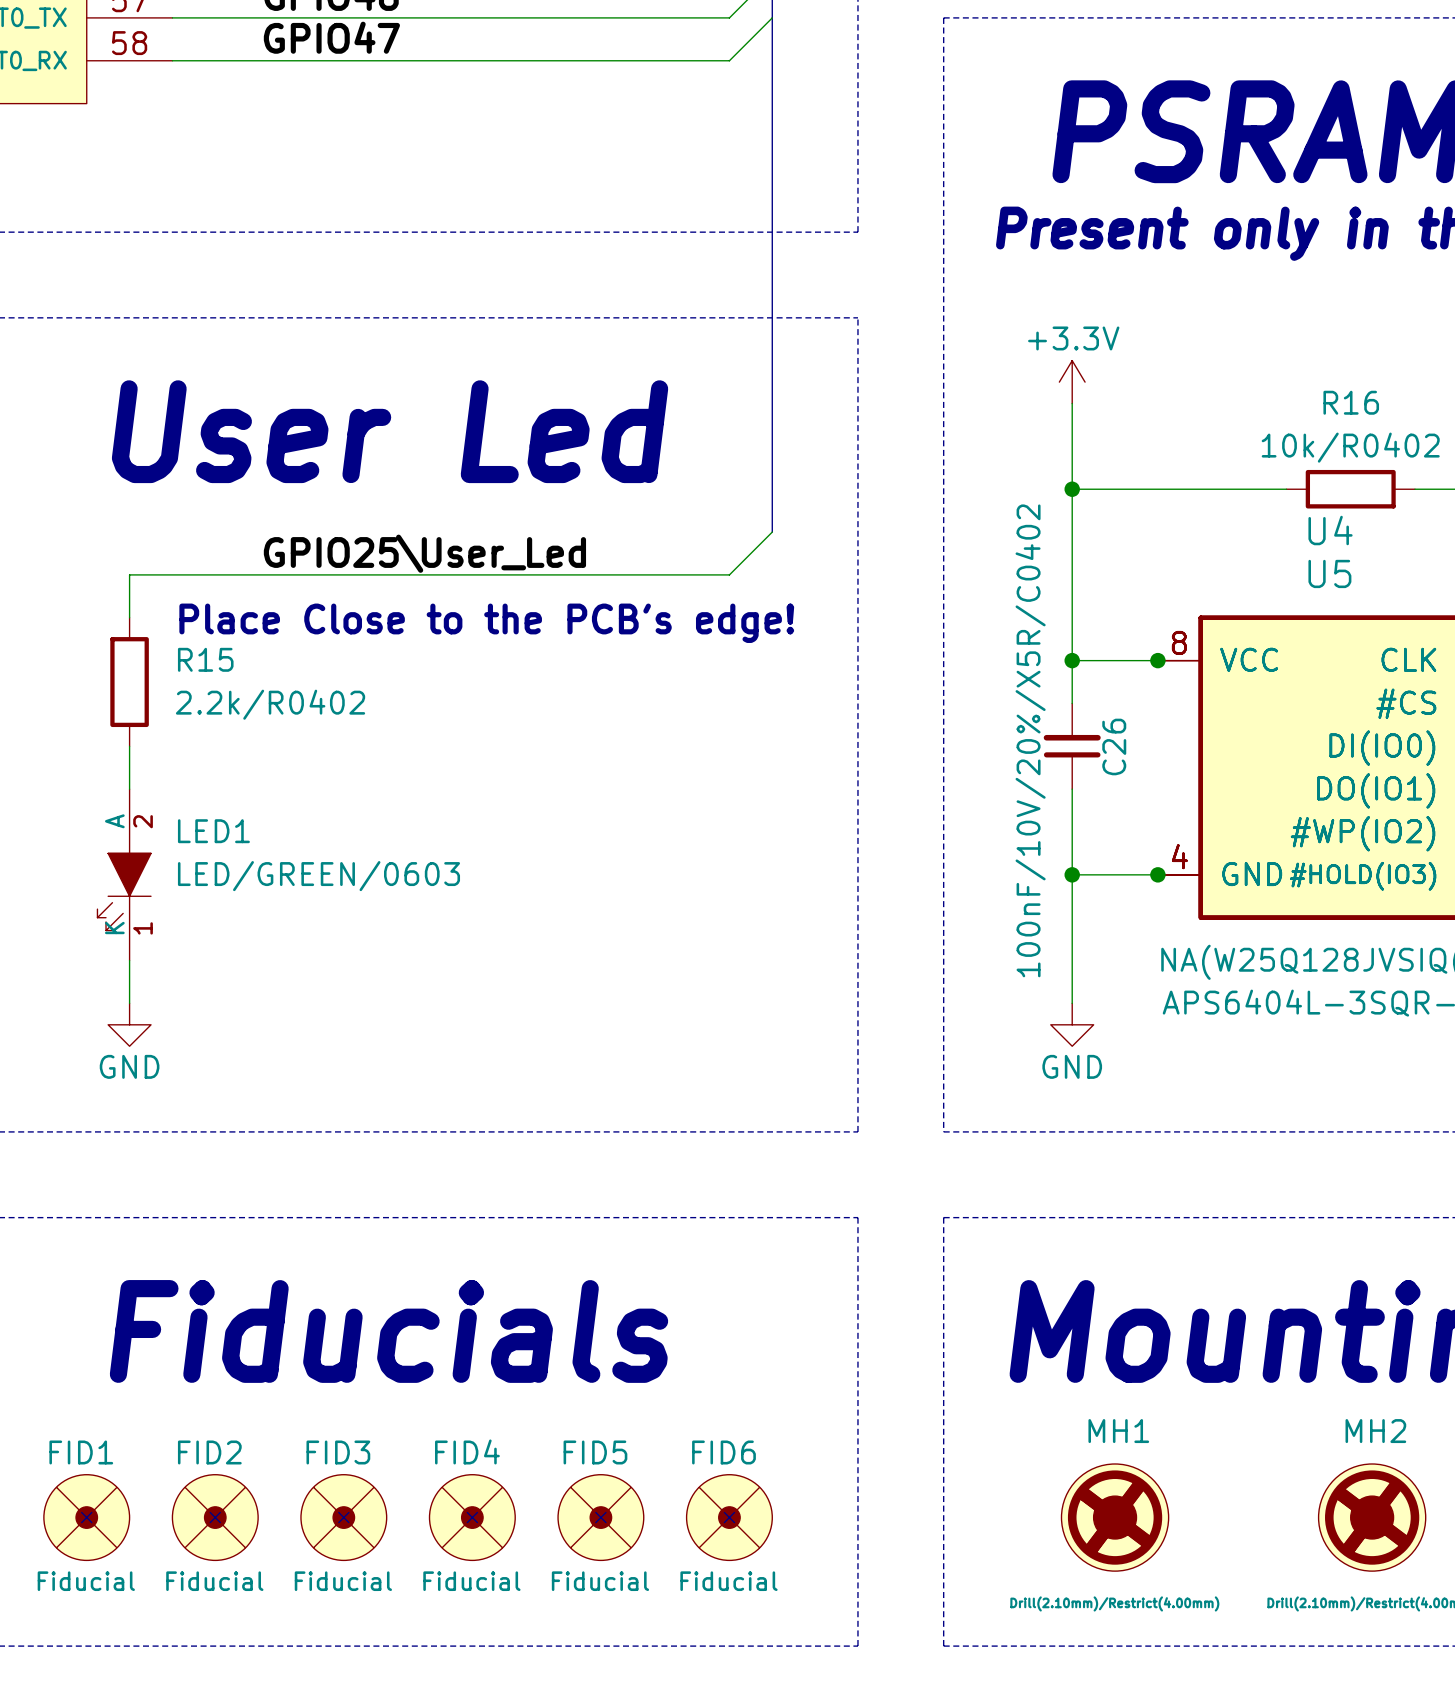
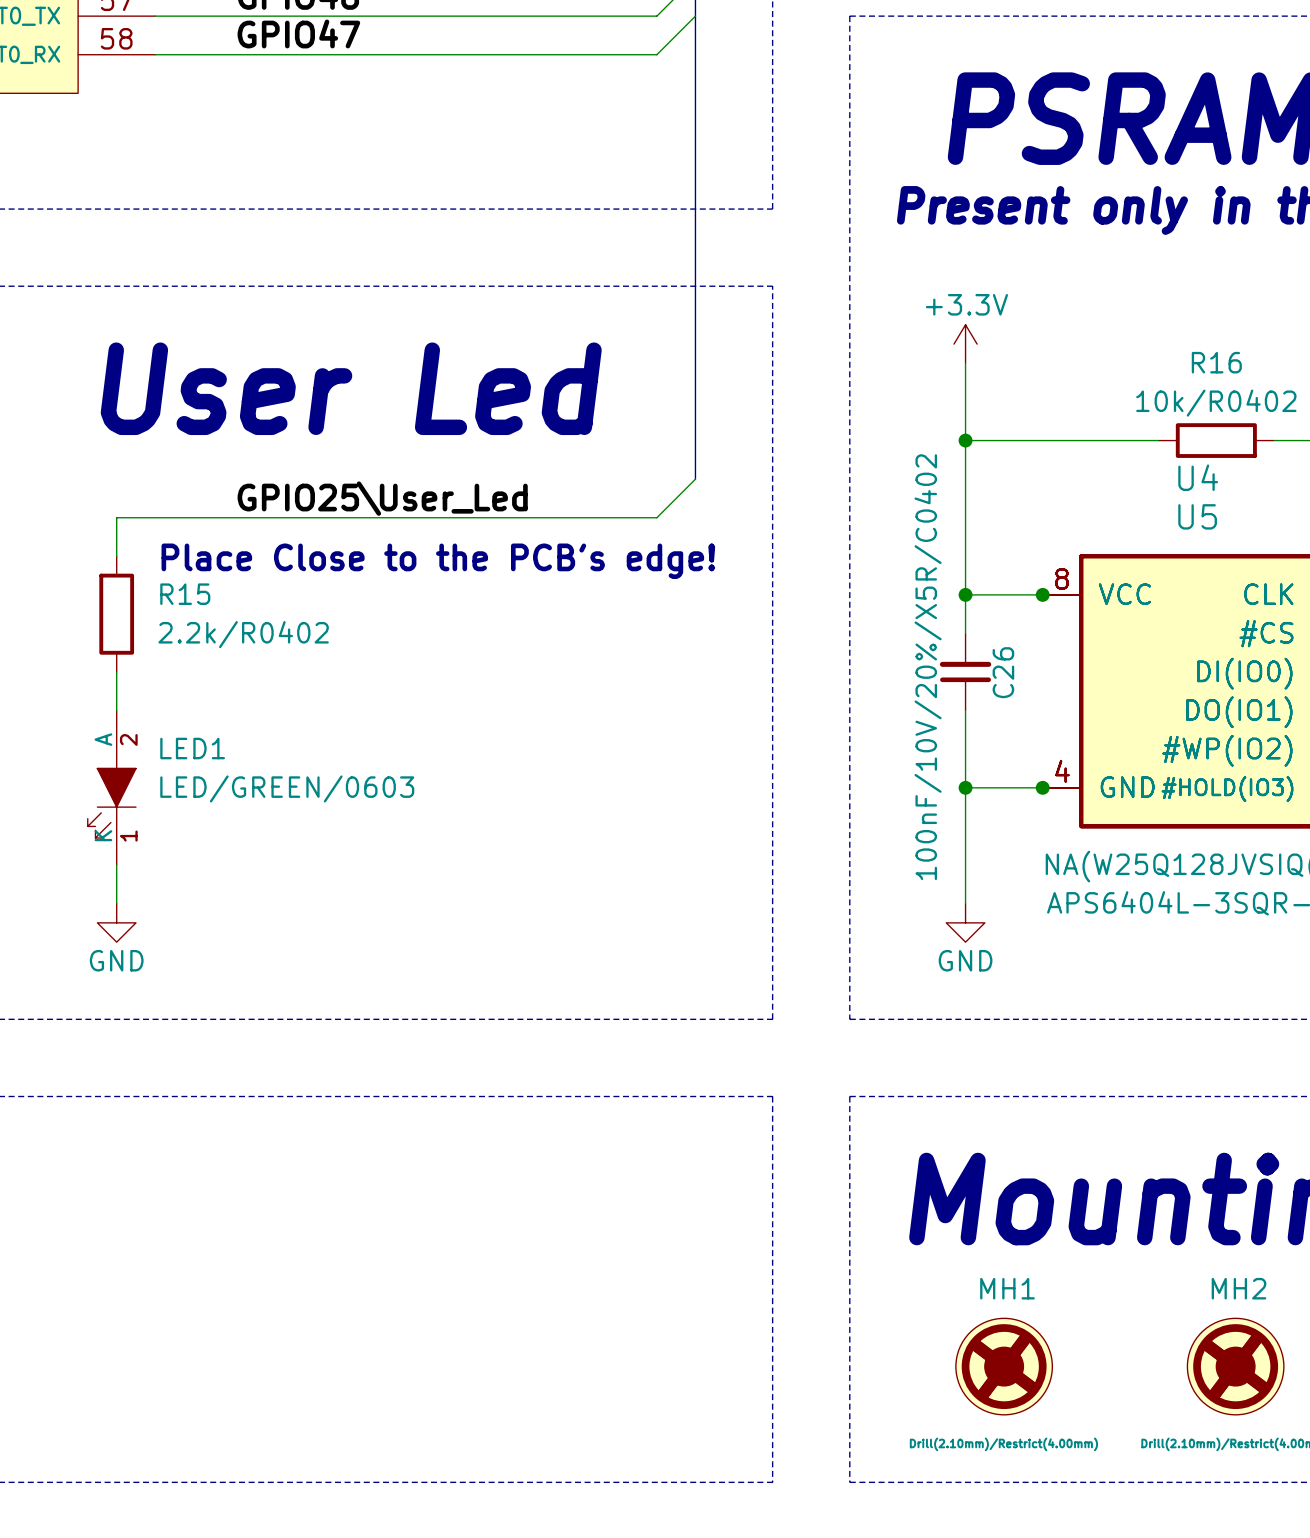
text: Fiducials (389, 1331) -> none
FID1: Fiducial (86, 1517) -> none
FID2: Fiducial (215, 1517) -> none
FID3: Fiducial (343, 1517) -> none
FID4: Fiducial (472, 1517) -> none
FID5: Fiducial (600, 1517) -> none
FID6: Fiducial (729, 1517) -> none

